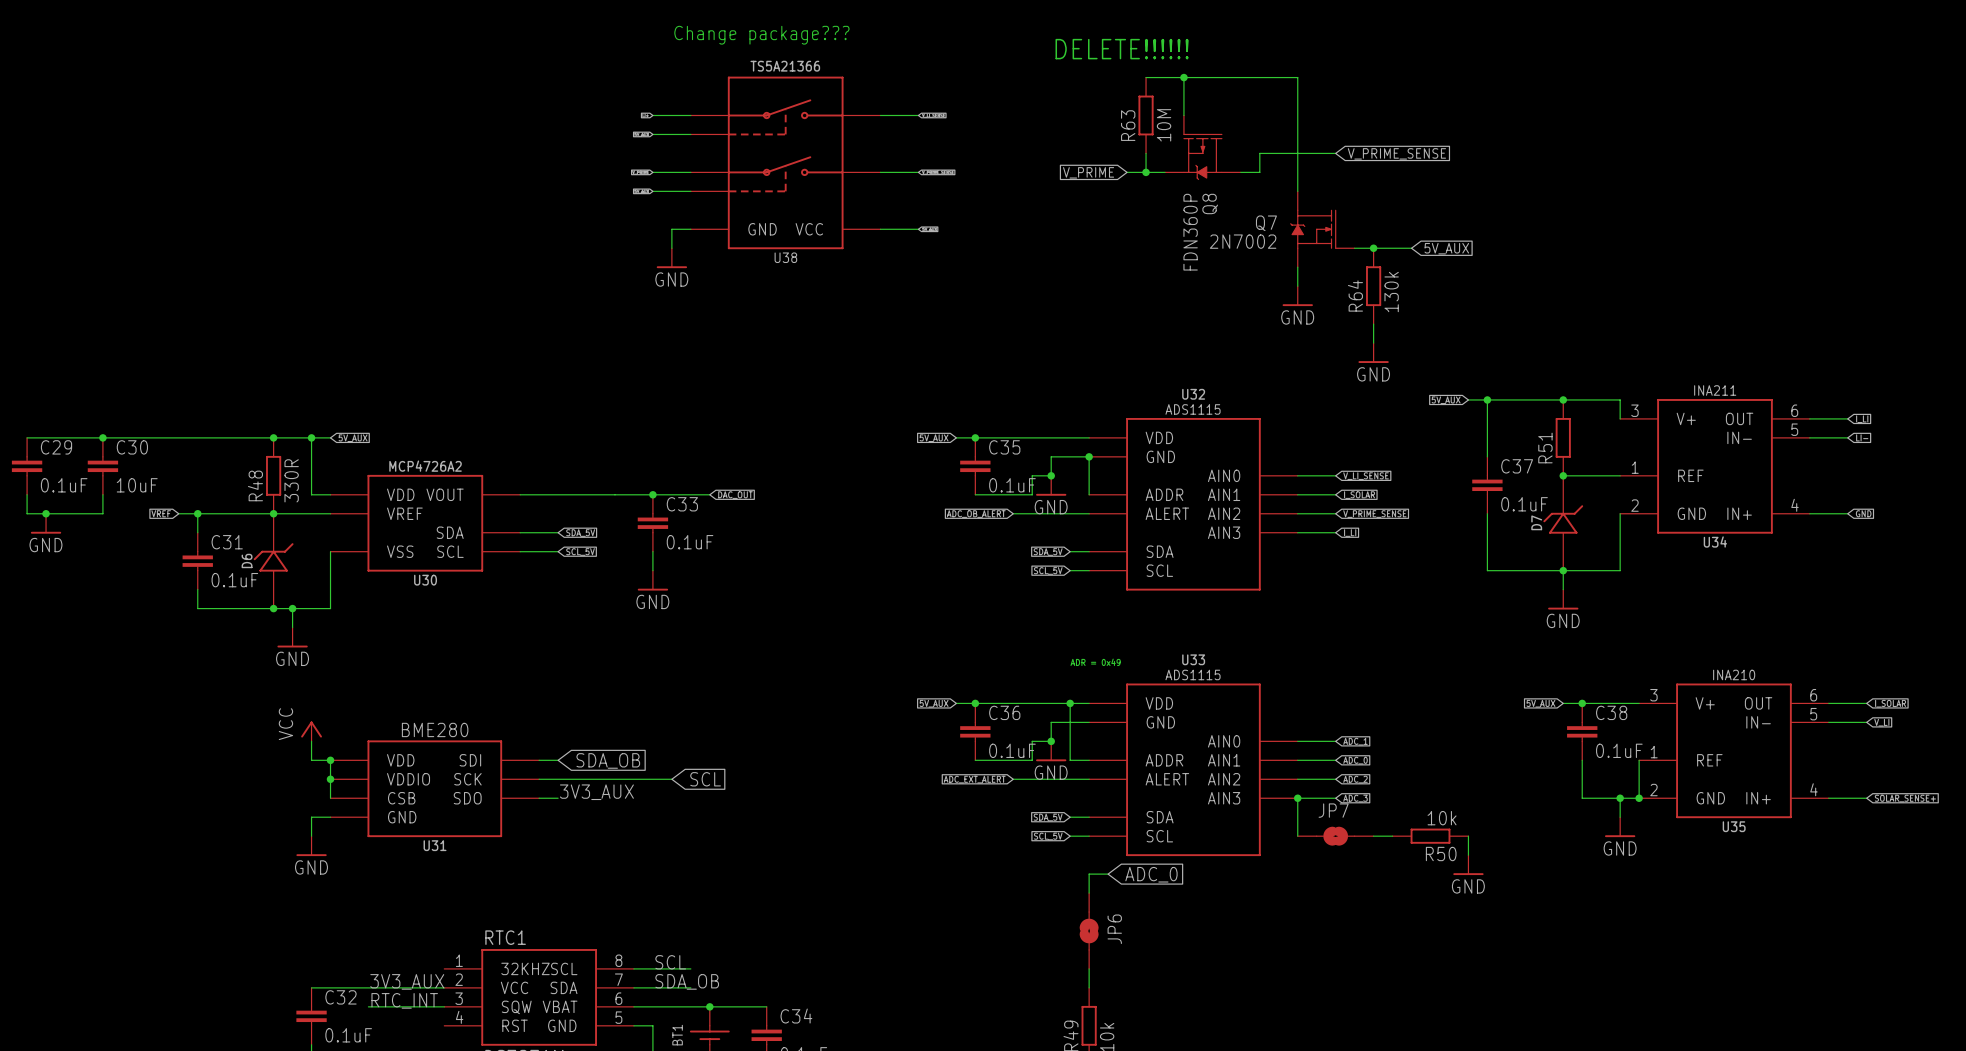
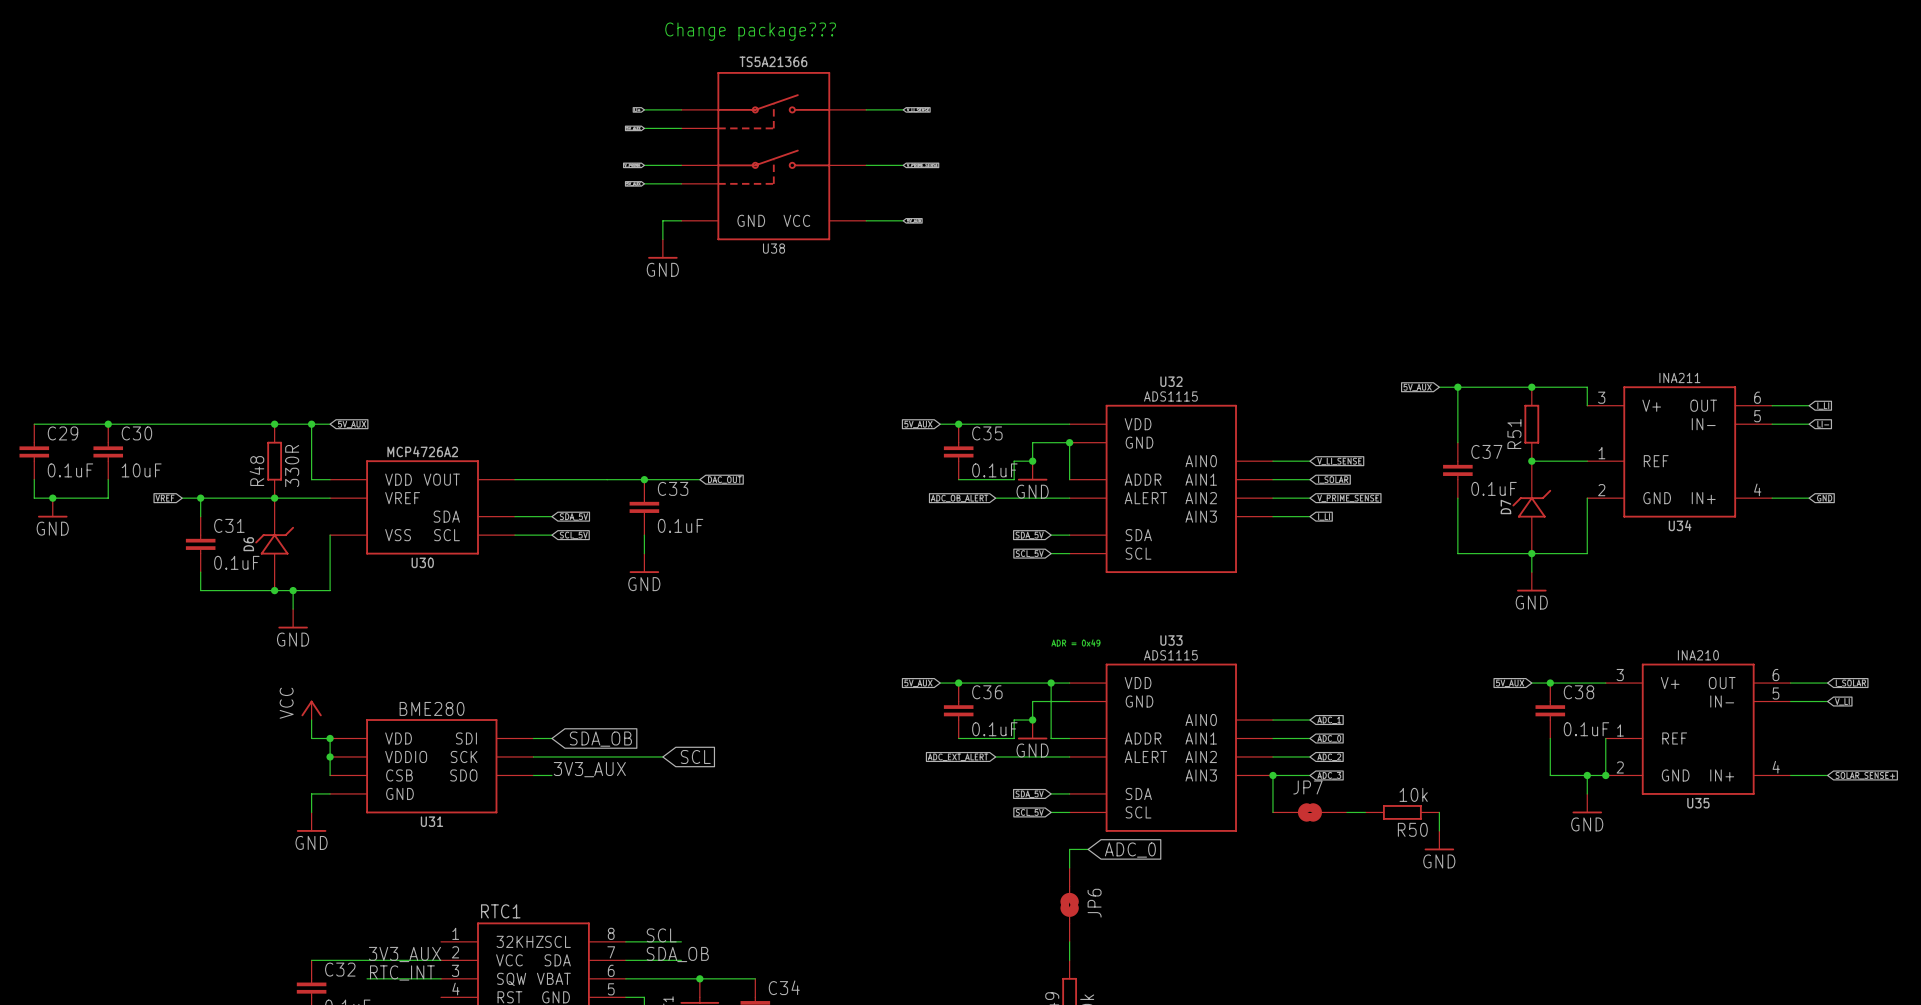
text: DELETE!!!!!! (1122, 49) -> none
wire: (1146, 77) (1297, 77) (1297, 191) -> none
wire: (1183, 77) (1183, 115) -> none
junction: (1183, 77) -> none
R63: 10M (1146, 115) -> none
Q8: FDN360P (1202, 147) -> none
wire: (1146, 153) (1146, 172) -> none
wire: (1335, 153) (1259, 153) (1259, 172) (1240, 172) -> none
global label: V_PRIME_SENSE (1396, 153) -> none
global label: V_PRIME (1088, 172) -> none
wire: (1127, 172) (1164, 172) -> none
junction: (1146, 172) -> none
Q7: 2N7002 (1322, 229) -> none
wire: (1354, 248) (1411, 248) -> none
junction: (1373, 248) -> none
global label: 5V_AUX (1446, 248) -> none
wire: (1297, 267) (1297, 286) -> none
R64: 130k (1373, 286) -> none
power symbol: GND (1297, 296) -> none
wire: (1373, 324) (1373, 343) -> none
power symbol: GND (1373, 353) -> none

